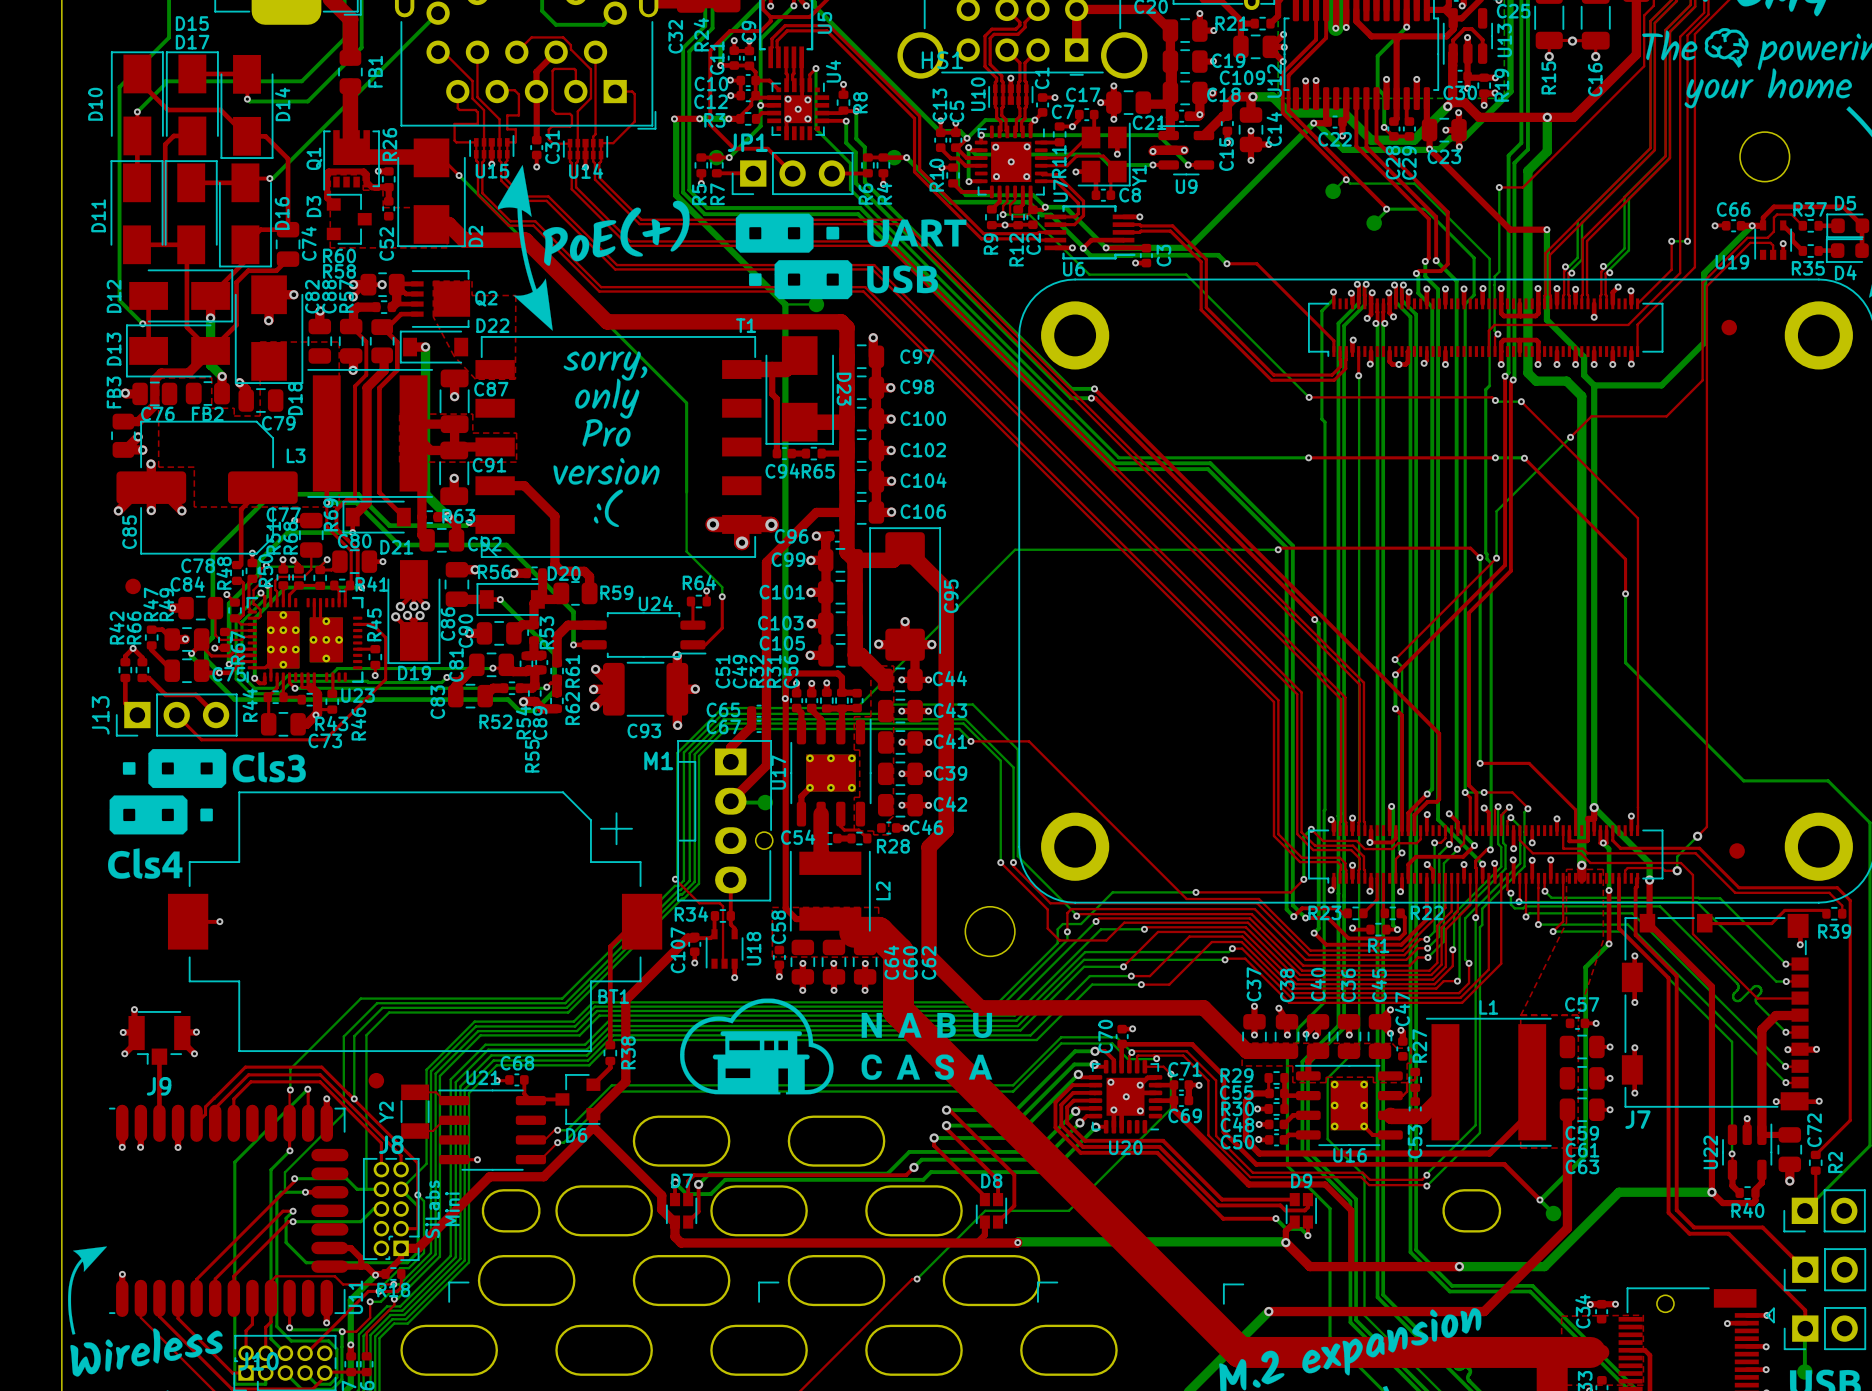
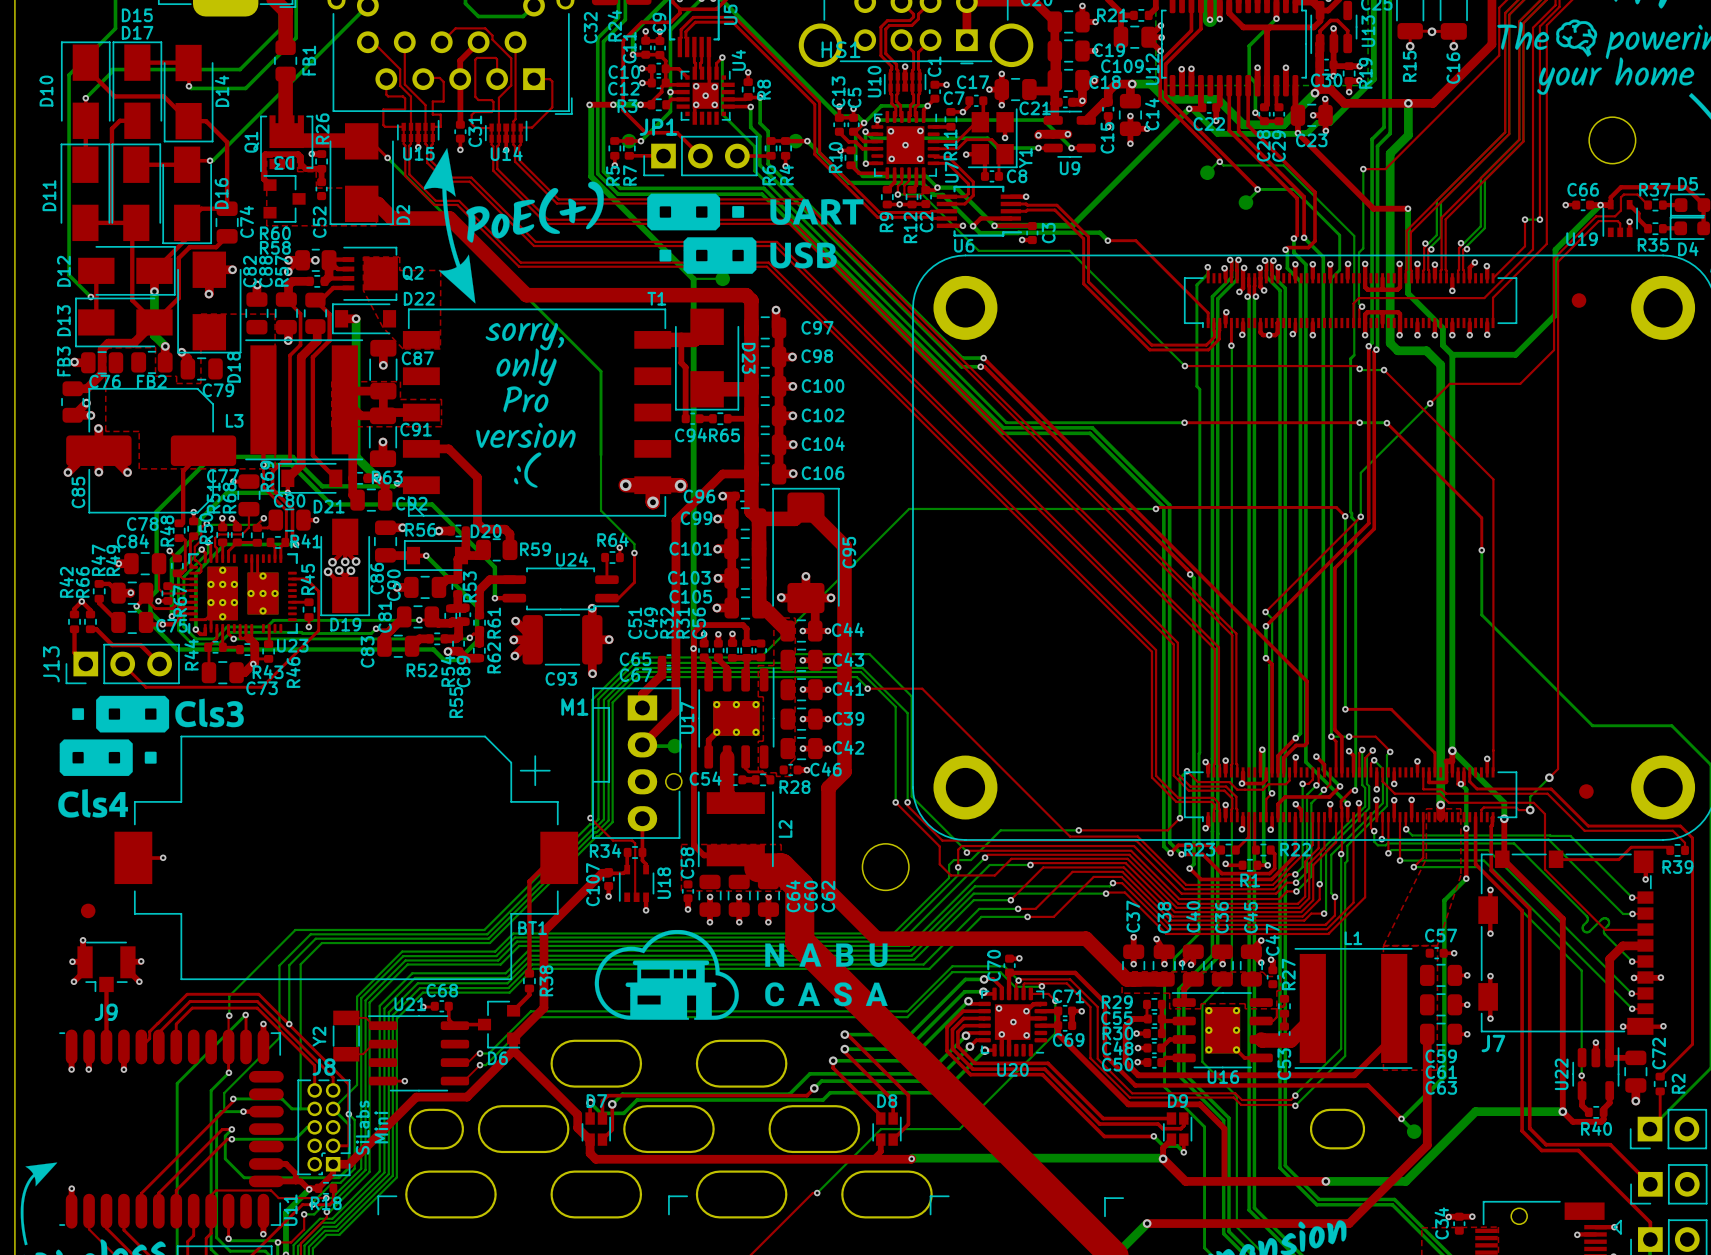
D3 name rotation: 0° (313, 206) -> 90° counterclockwise (284, 163)
D3 name position: D3 (313, 206) -> D3 (284, 163)
part: (133, 586) -> none
part: none -> (88, 910)
part: (376, 1080) -> none

